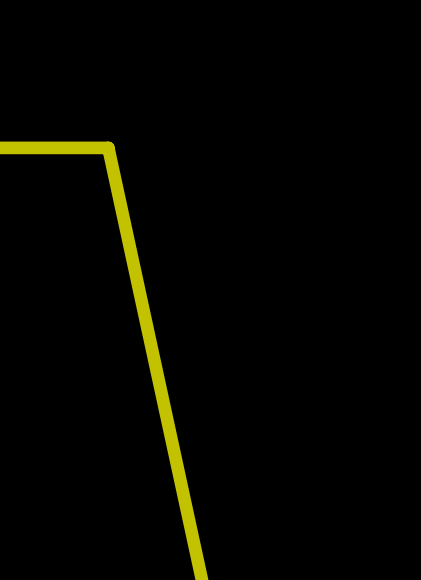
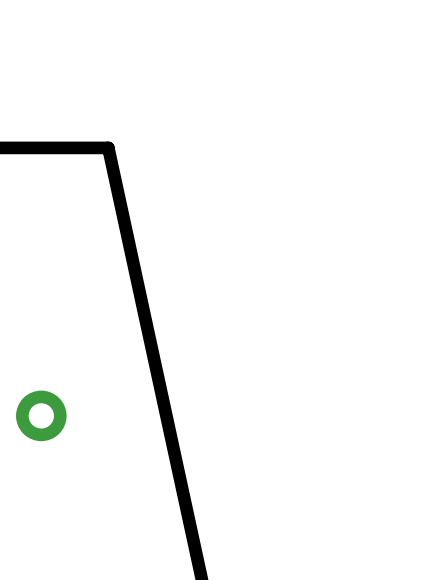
via: none -> (41, 415)

